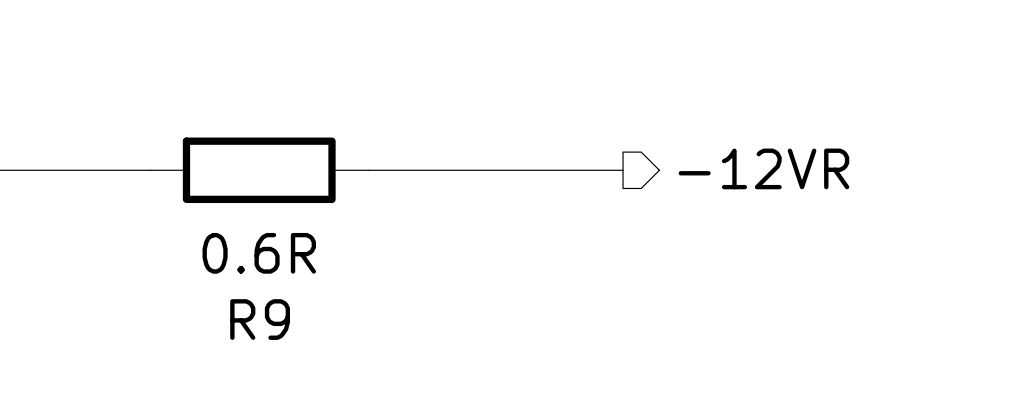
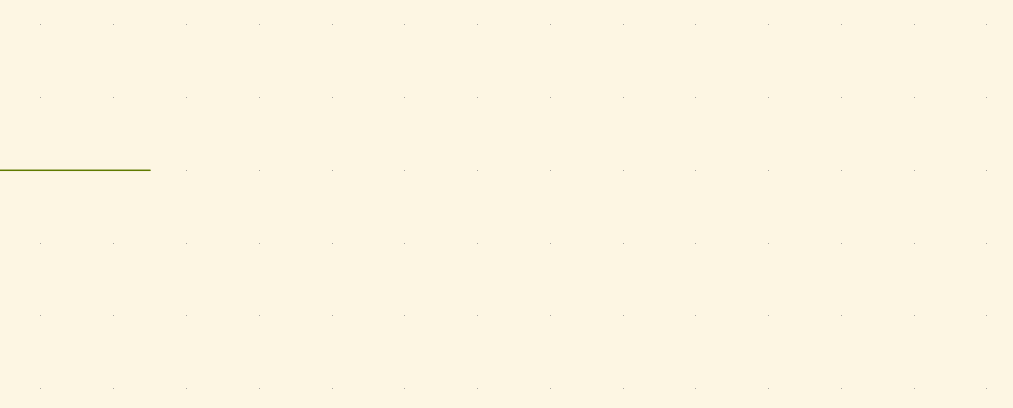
hierarchical label: -12VR (763, 168) -> none
R9: 0.6R (259, 170) -> none
wire: (368, 170) (623, 170) -> none

